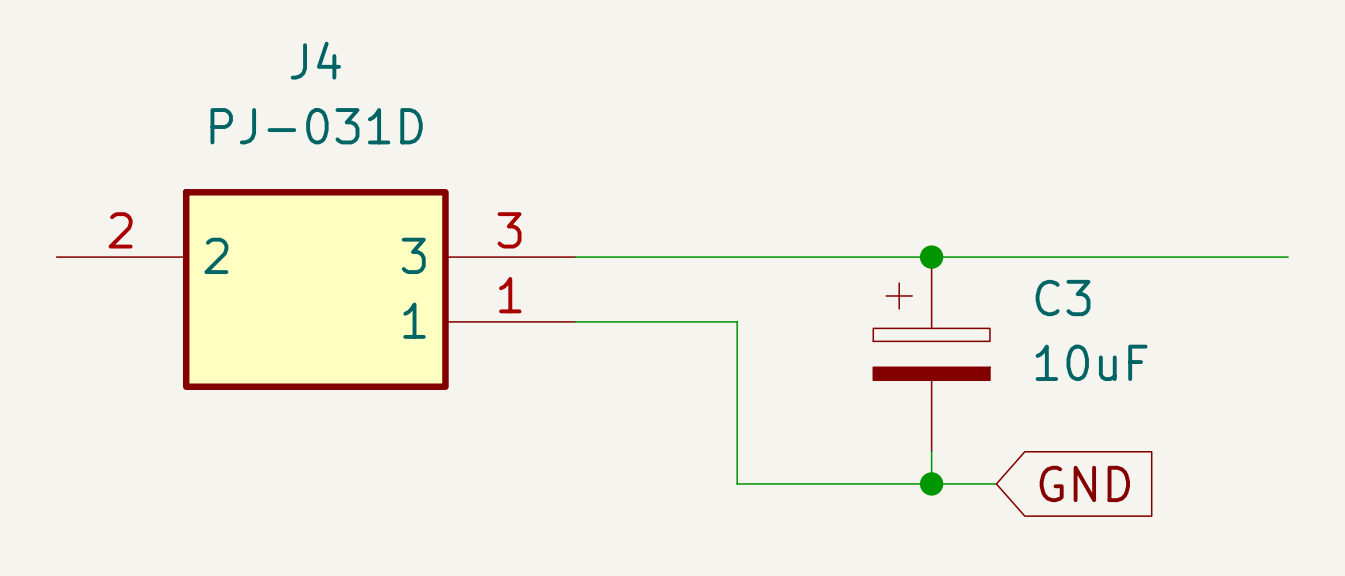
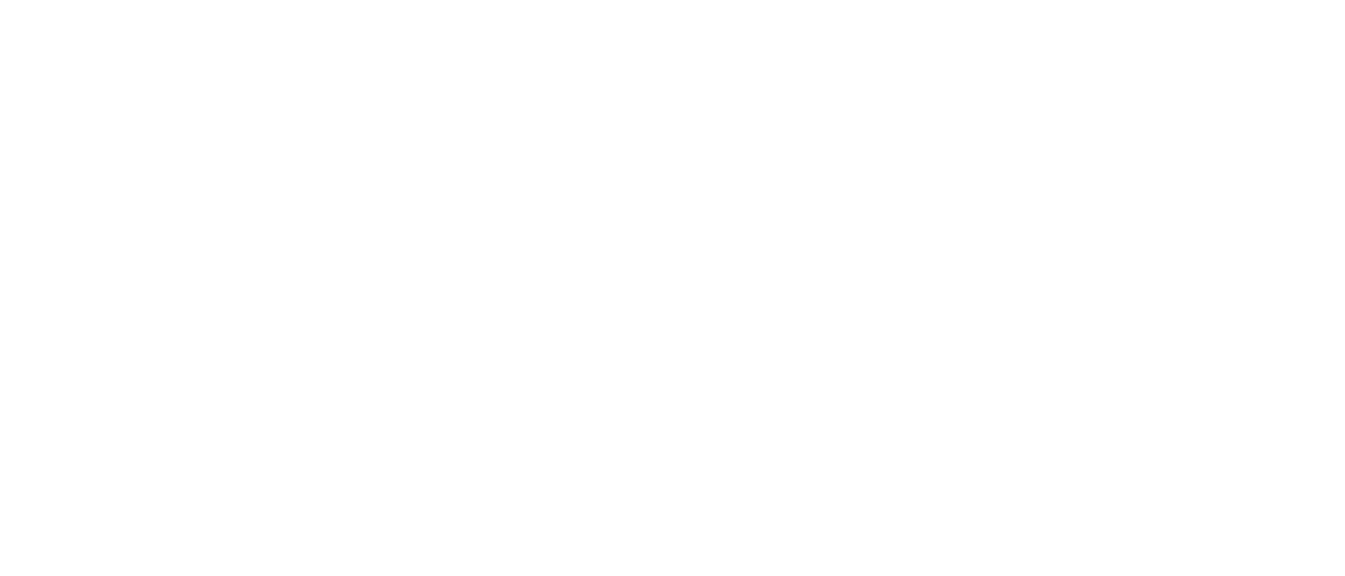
wire: (575, 257) (1288, 257) -> none
junction: (931, 257) -> none
J4: PJ-031D (315, 289) -> none
wire: (575, 321) (737, 321) (737, 483) (996, 483) -> none
C3: 10uF (931, 354) -> none
wire: (931, 451) (931, 483) -> none
junction: (931, 483) -> none
global label: GND (1084, 483) -> none

